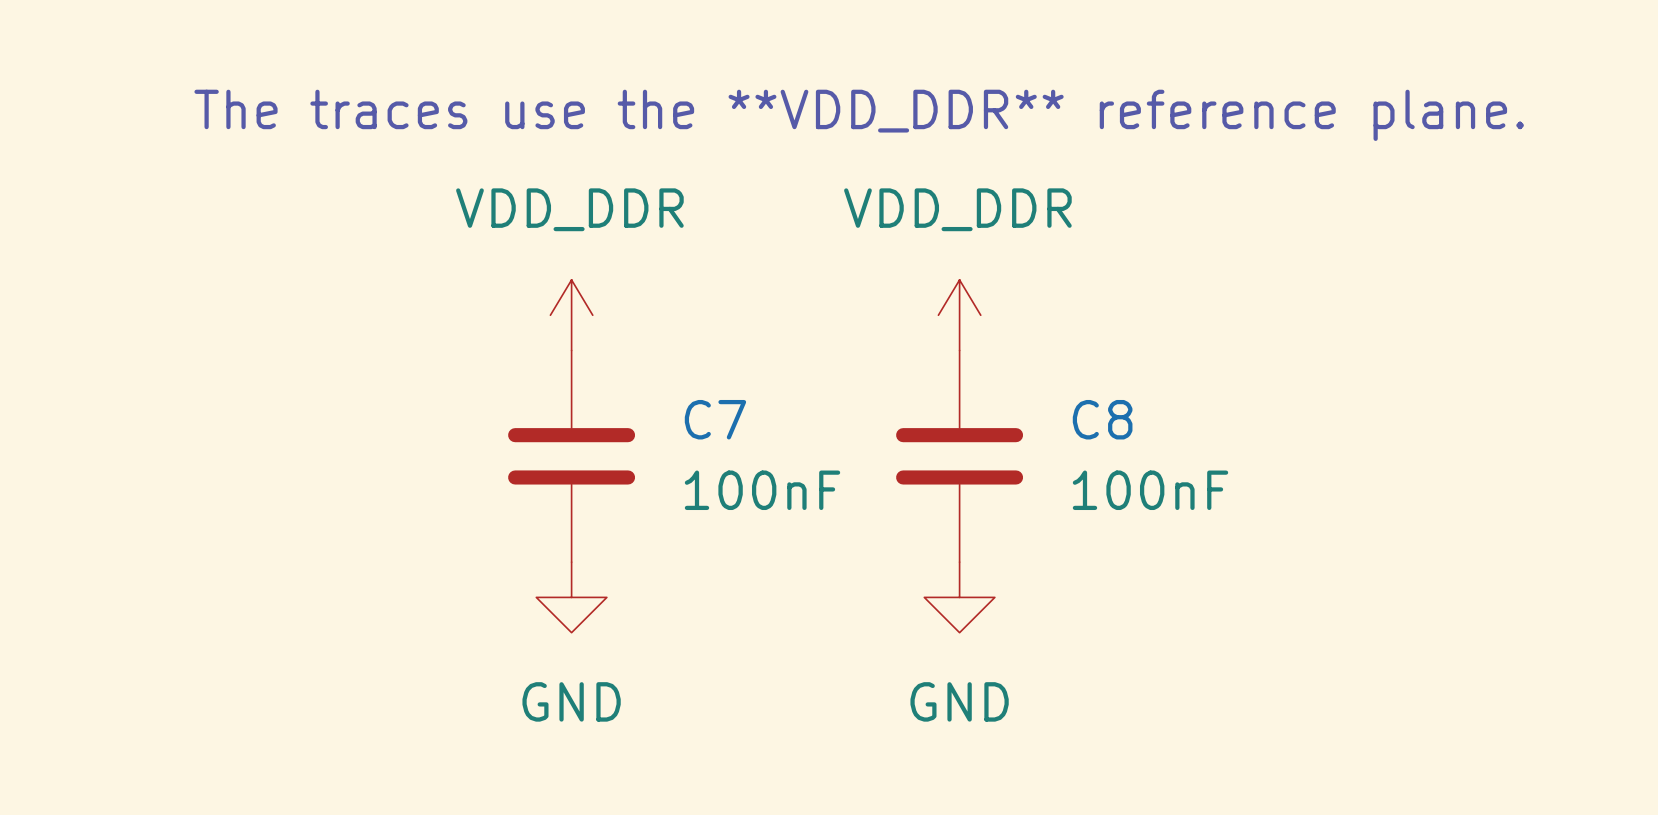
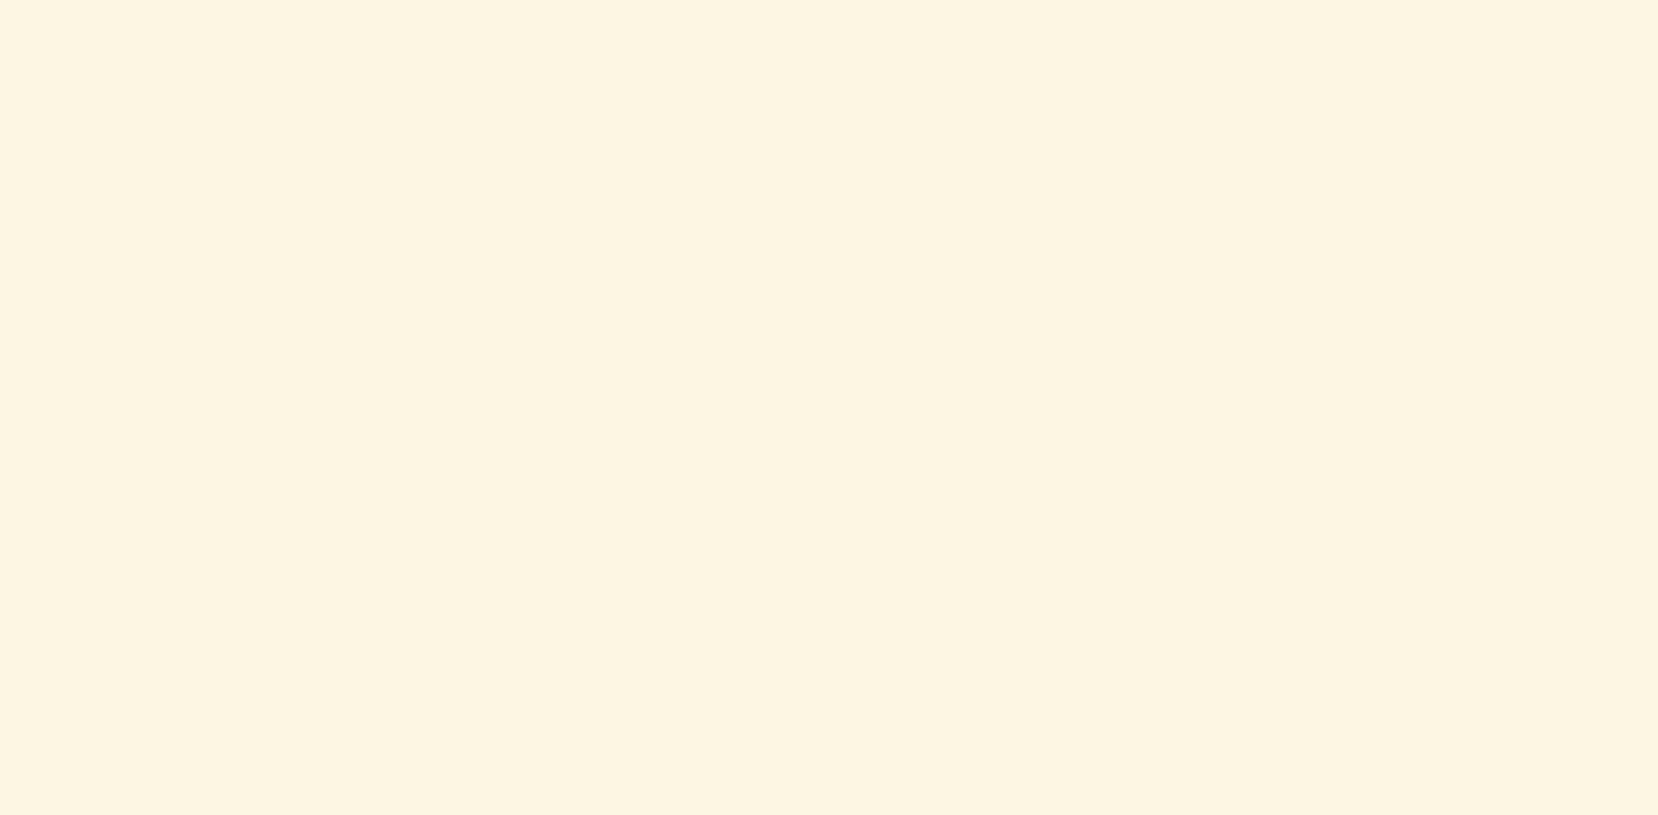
text: The traces use the **VDD_DDR** reference plane. (859, 115) -> none
power symbol: VDD_DDR (571, 315) -> none
power symbol: VDD_DDR (959, 315) -> none
C7: 100nF (571, 456) -> none
C8: 100nF (959, 456) -> none
power symbol: GND (571, 597) -> none
power symbol: GND (959, 597) -> none

